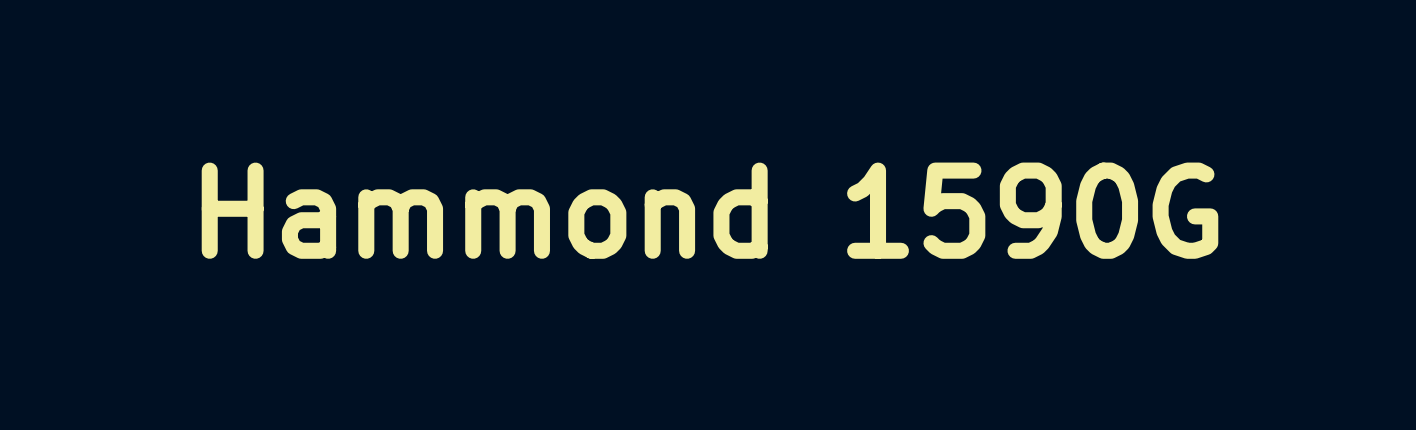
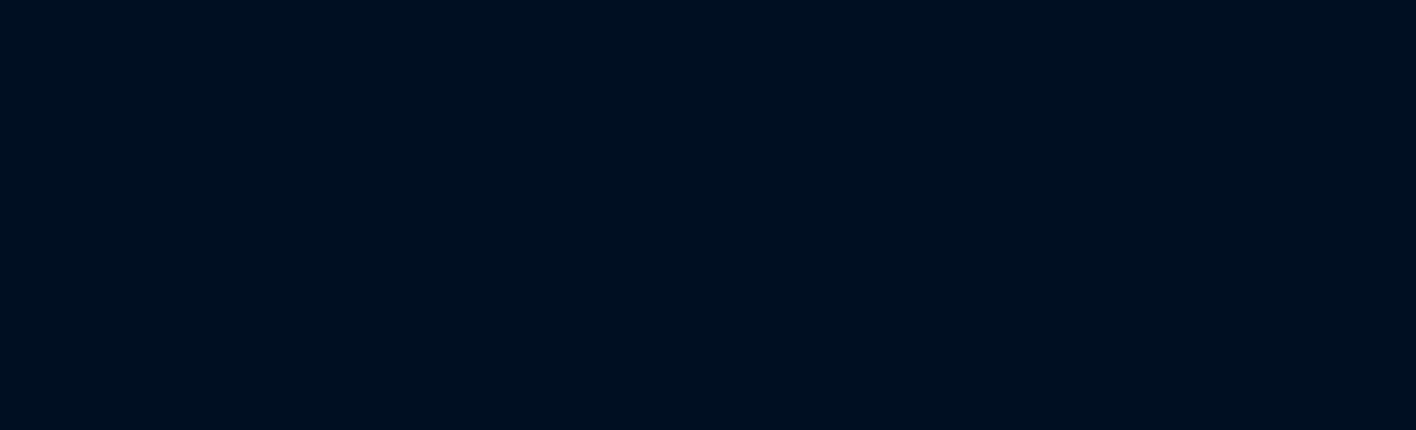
text: Hammond 1590G (709, 210) -> none

